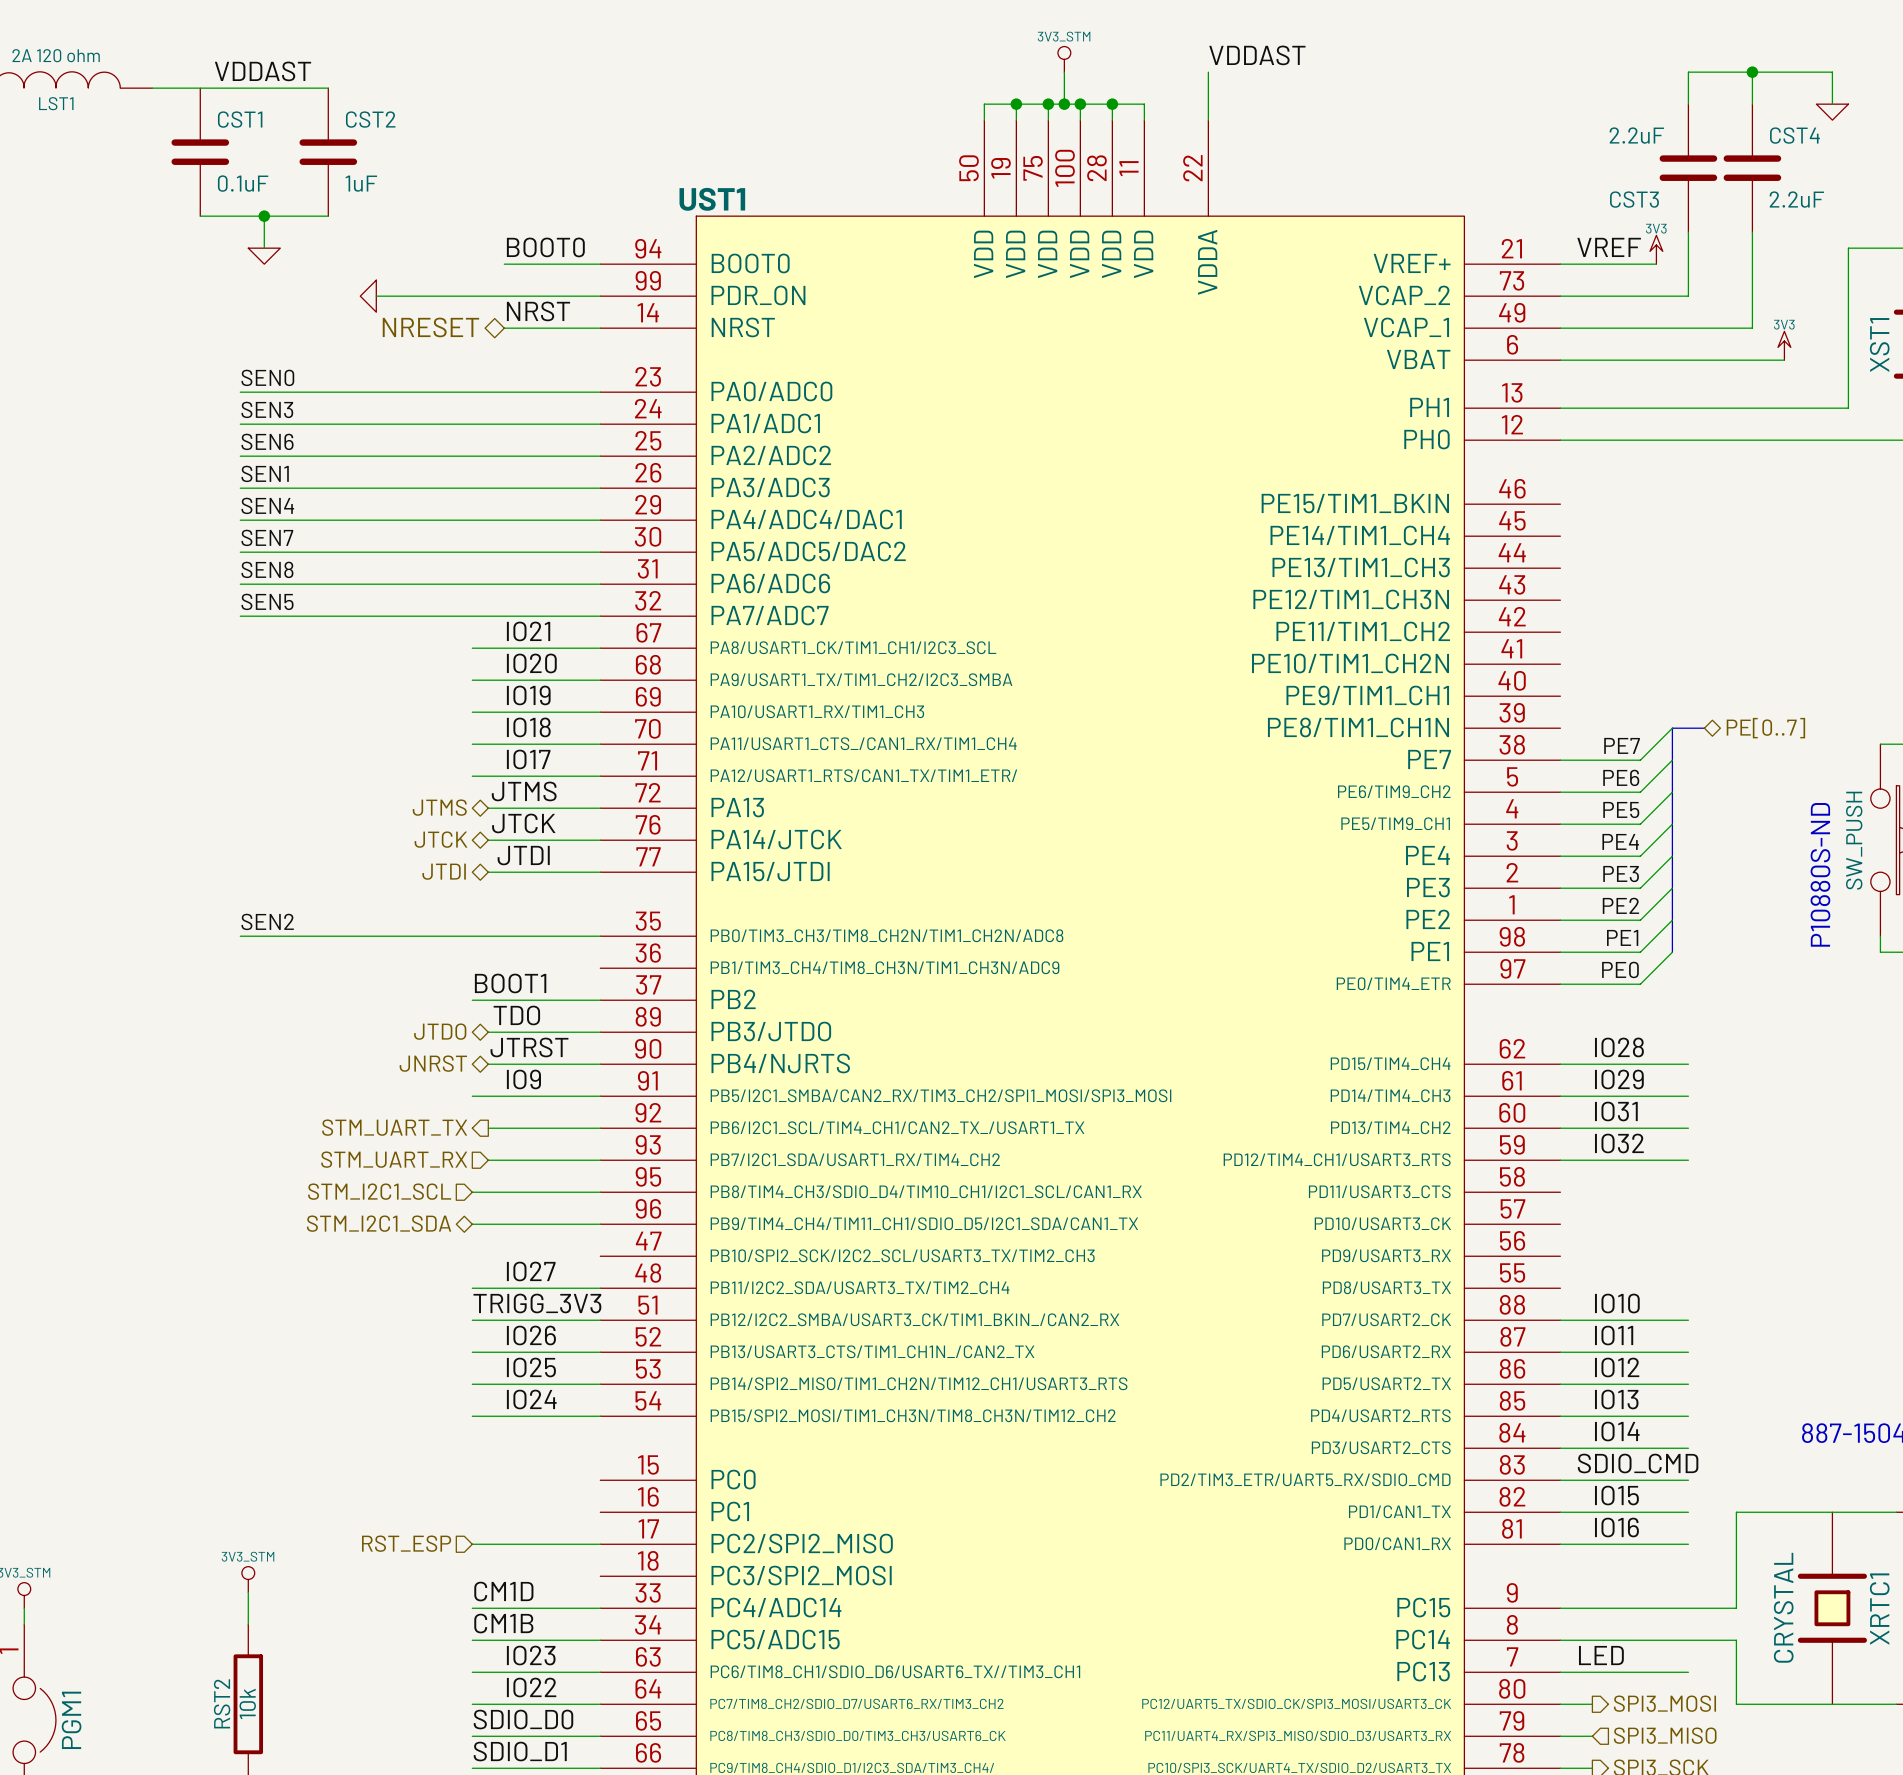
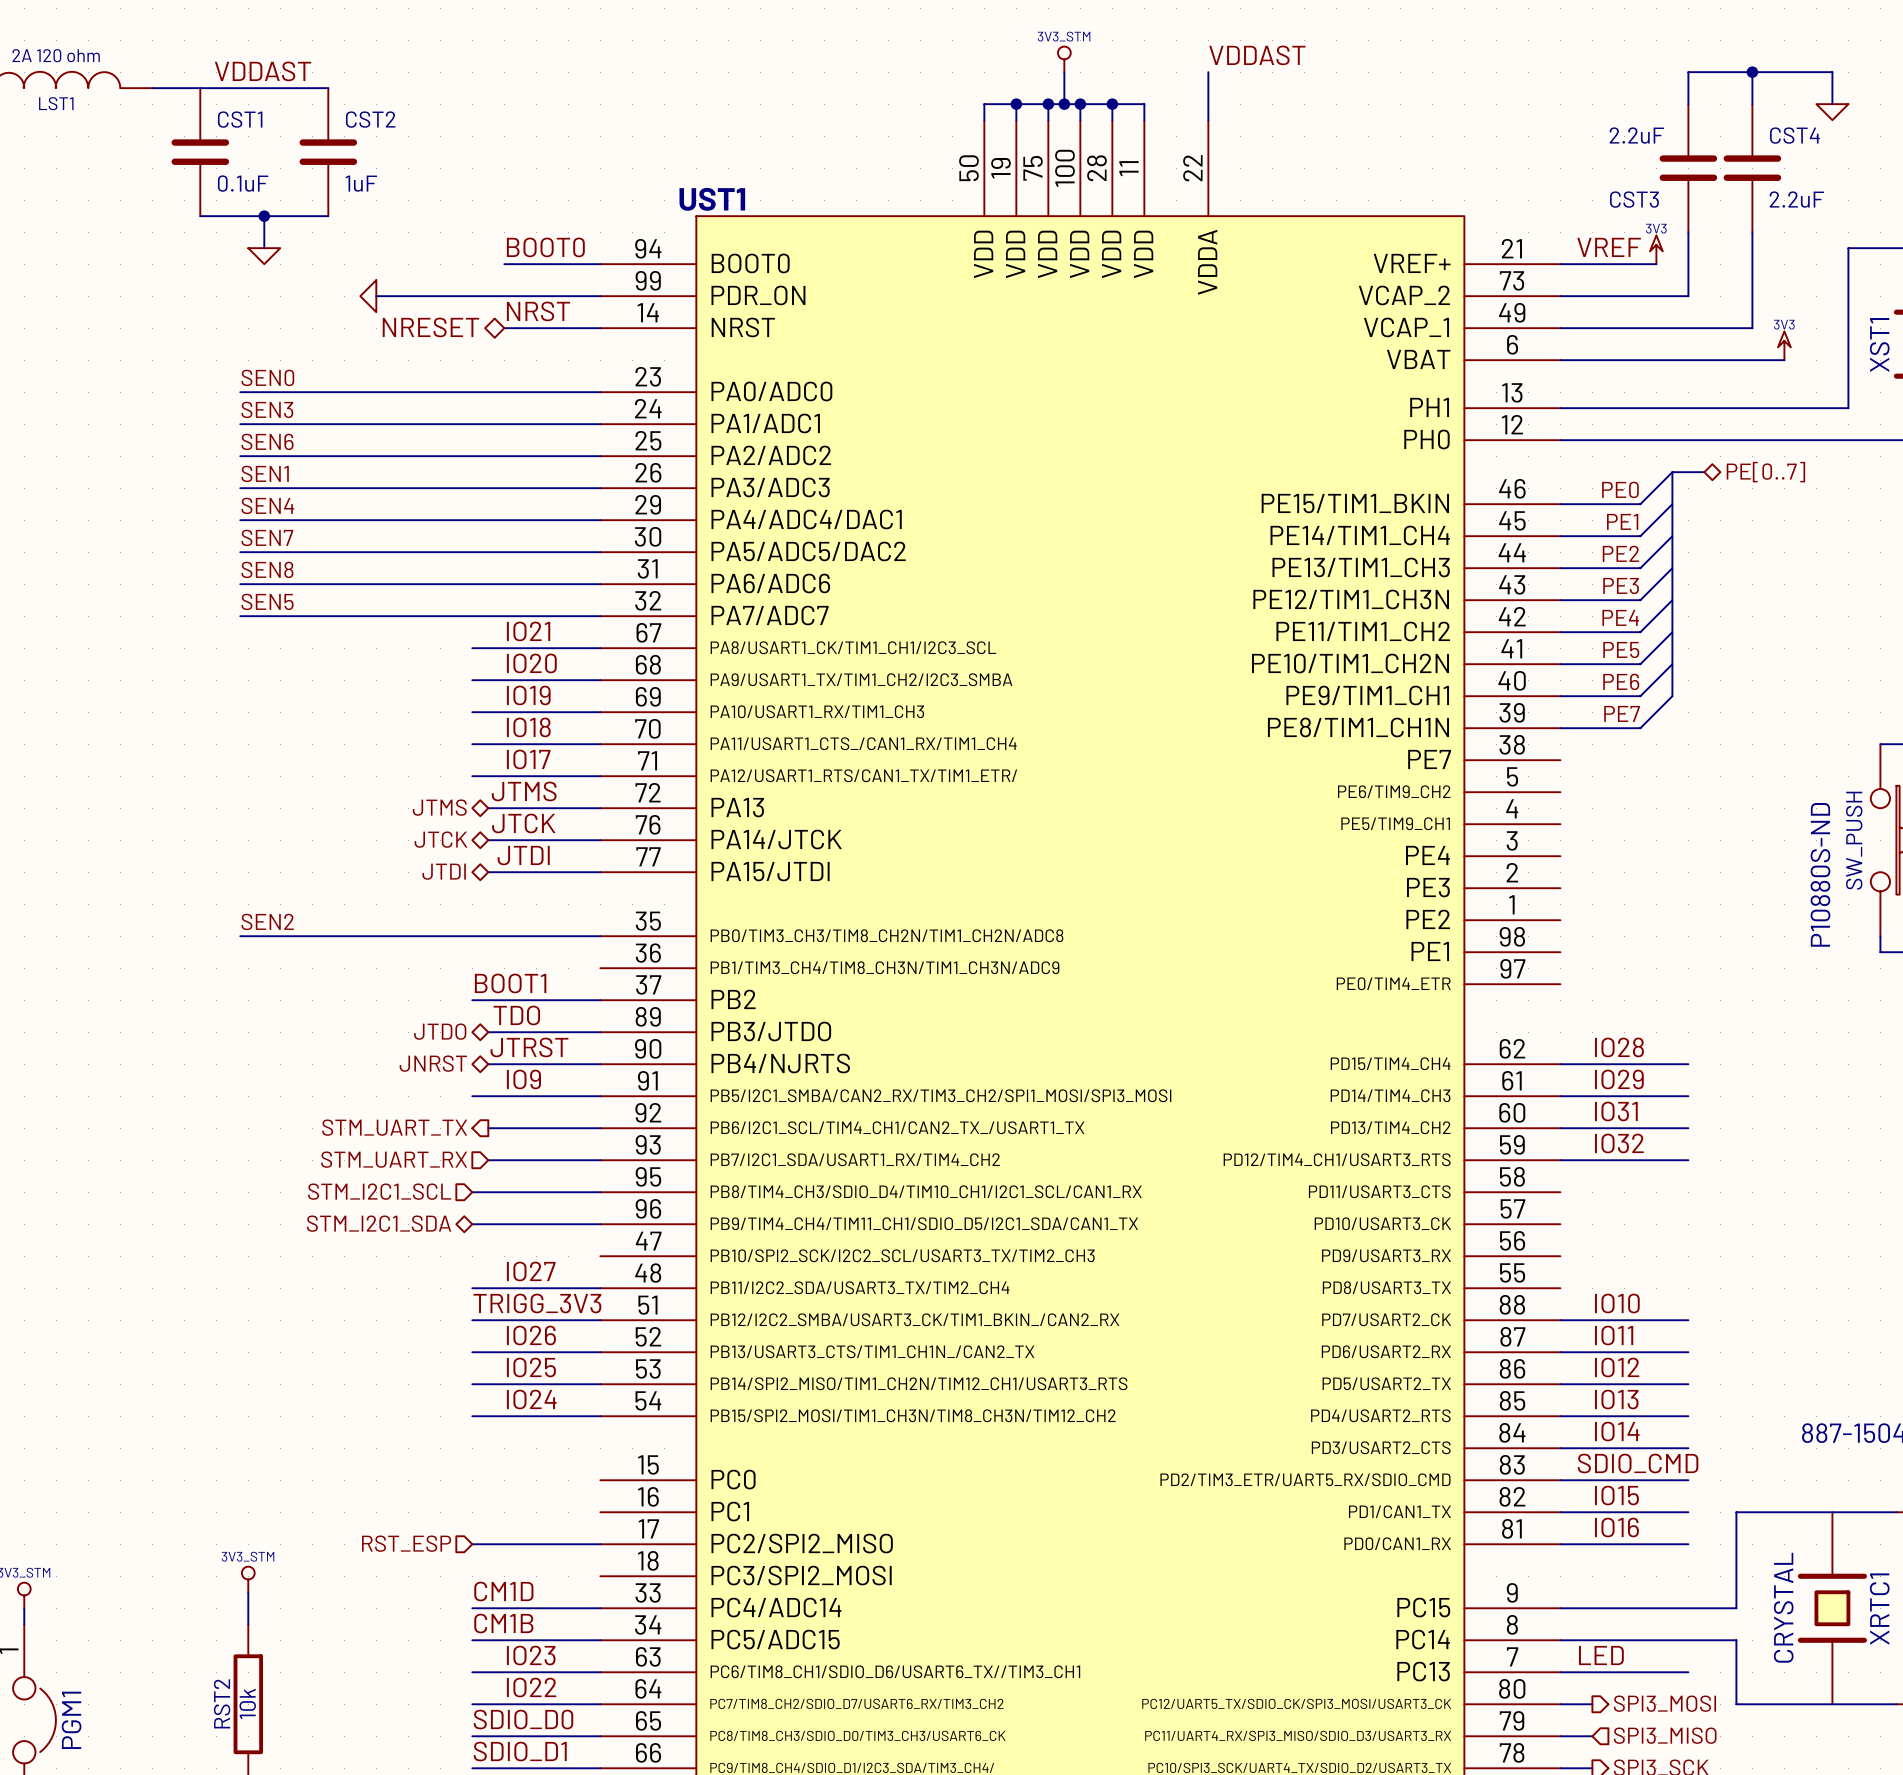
label: none -> PE0 (1620, 489)
label: none -> PE1 (1622, 521)
label: none -> PE2 (1620, 553)
wire: (1672, 728) (1640, 760) (1560, 760) -> (1672, 472) (1640, 504) (1560, 504)
bus: (1704, 728) (1672, 728) (1672, 952) -> (1704, 472) (1672, 472) (1672, 696)
hierarchical label position: PE[0..7] (1765, 728) -> PE[0..7] (1765, 472)
label position: PE7 (1622, 745) -> PE7 (1622, 713)
wire: (1672, 760) (1640, 792) (1560, 792) -> (1672, 504) (1640, 536) (1560, 536)
label position: PE6 (1621, 777) -> PE6 (1621, 681)
wire: (1672, 792) (1640, 824) (1560, 824) -> (1672, 536) (1640, 568) (1560, 568)
label position: PE5 (1621, 810) -> PE5 (1621, 649)
wire: (1672, 824) (1640, 856) (1560, 856) -> (1672, 568) (1640, 600) (1560, 600)
label position: PE4 (1620, 841) -> PE4 (1620, 617)
wire: (1672, 856) (1640, 888) (1560, 888) -> (1672, 600) (1640, 632) (1560, 632)
label position: PE3 (1621, 874) -> PE3 (1621, 585)
wire: (1672, 888) (1640, 920) (1560, 920) -> (1672, 632) (1640, 664) (1560, 664)
label: PE2 (1620, 905) -> none
wire: (1672, 920) (1640, 952) (1560, 952) -> (1672, 664) (1640, 696) (1560, 696)
label: PE1 (1622, 937) -> none
wire: (1672, 952) (1640, 984) (1560, 984) -> (1672, 696) (1640, 728) (1560, 728)
label: PE0 (1620, 969) -> none

